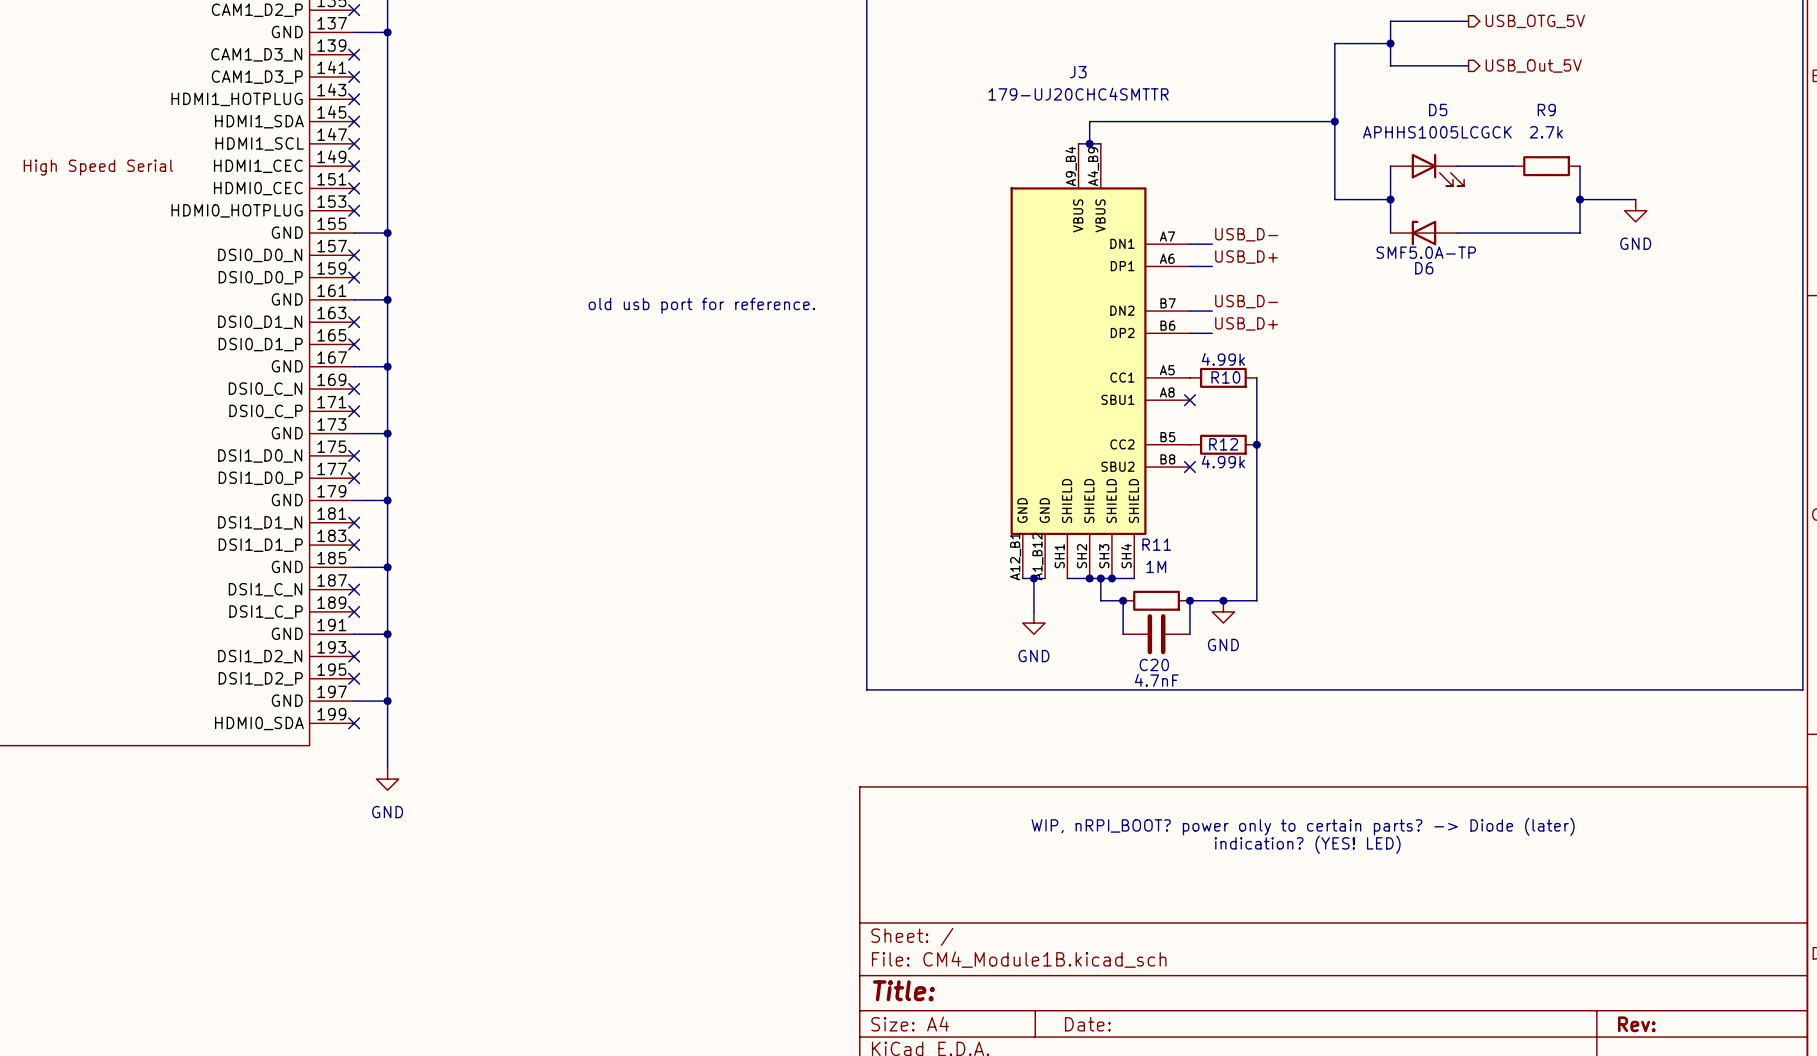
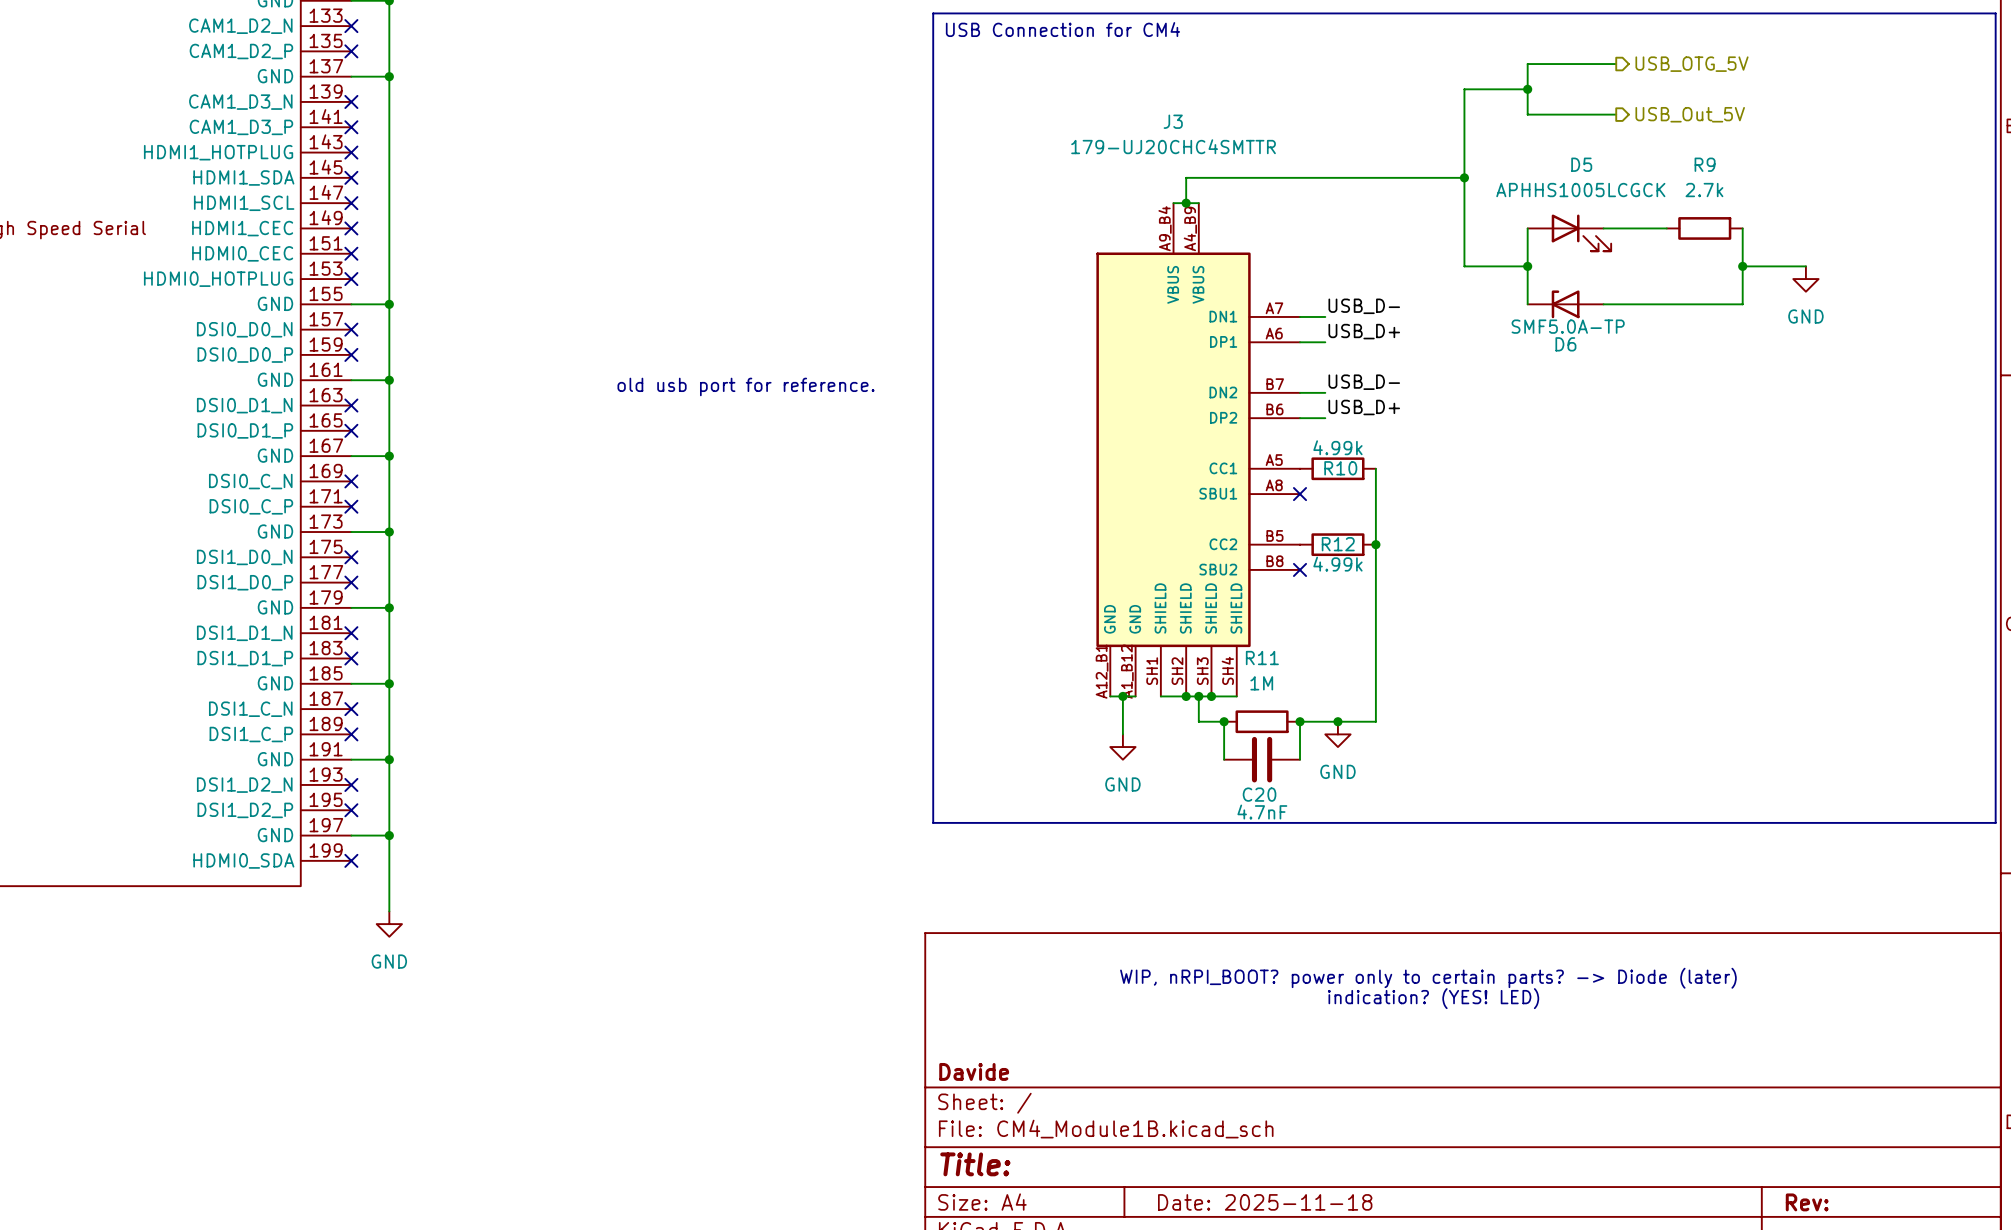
title block: none -> Davide (974, 1071)
title block: Date: (1087, 1024) -> Date: 2025-11-18 (1265, 1202)

